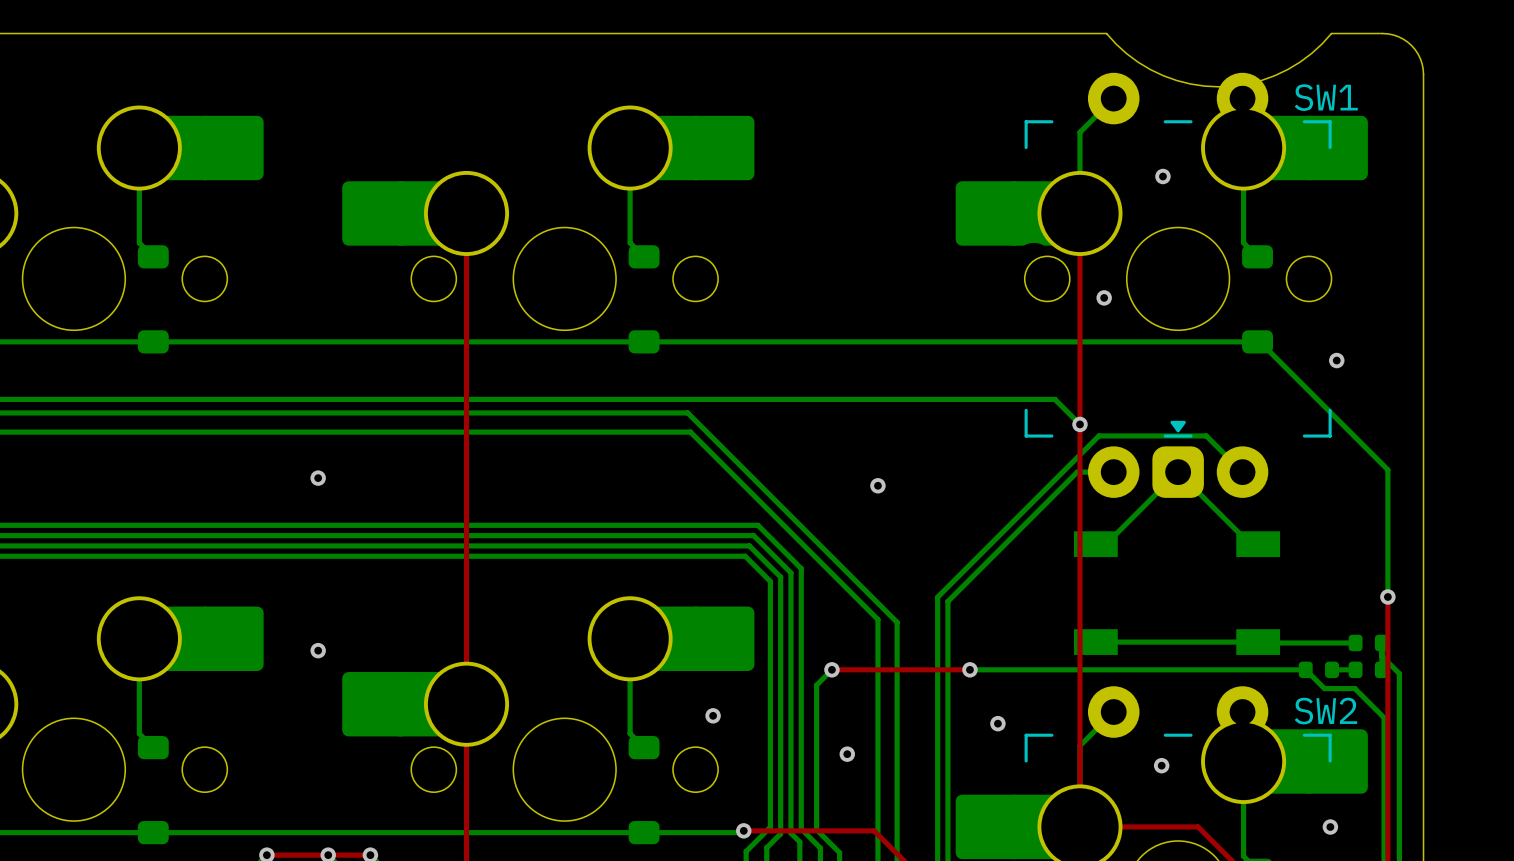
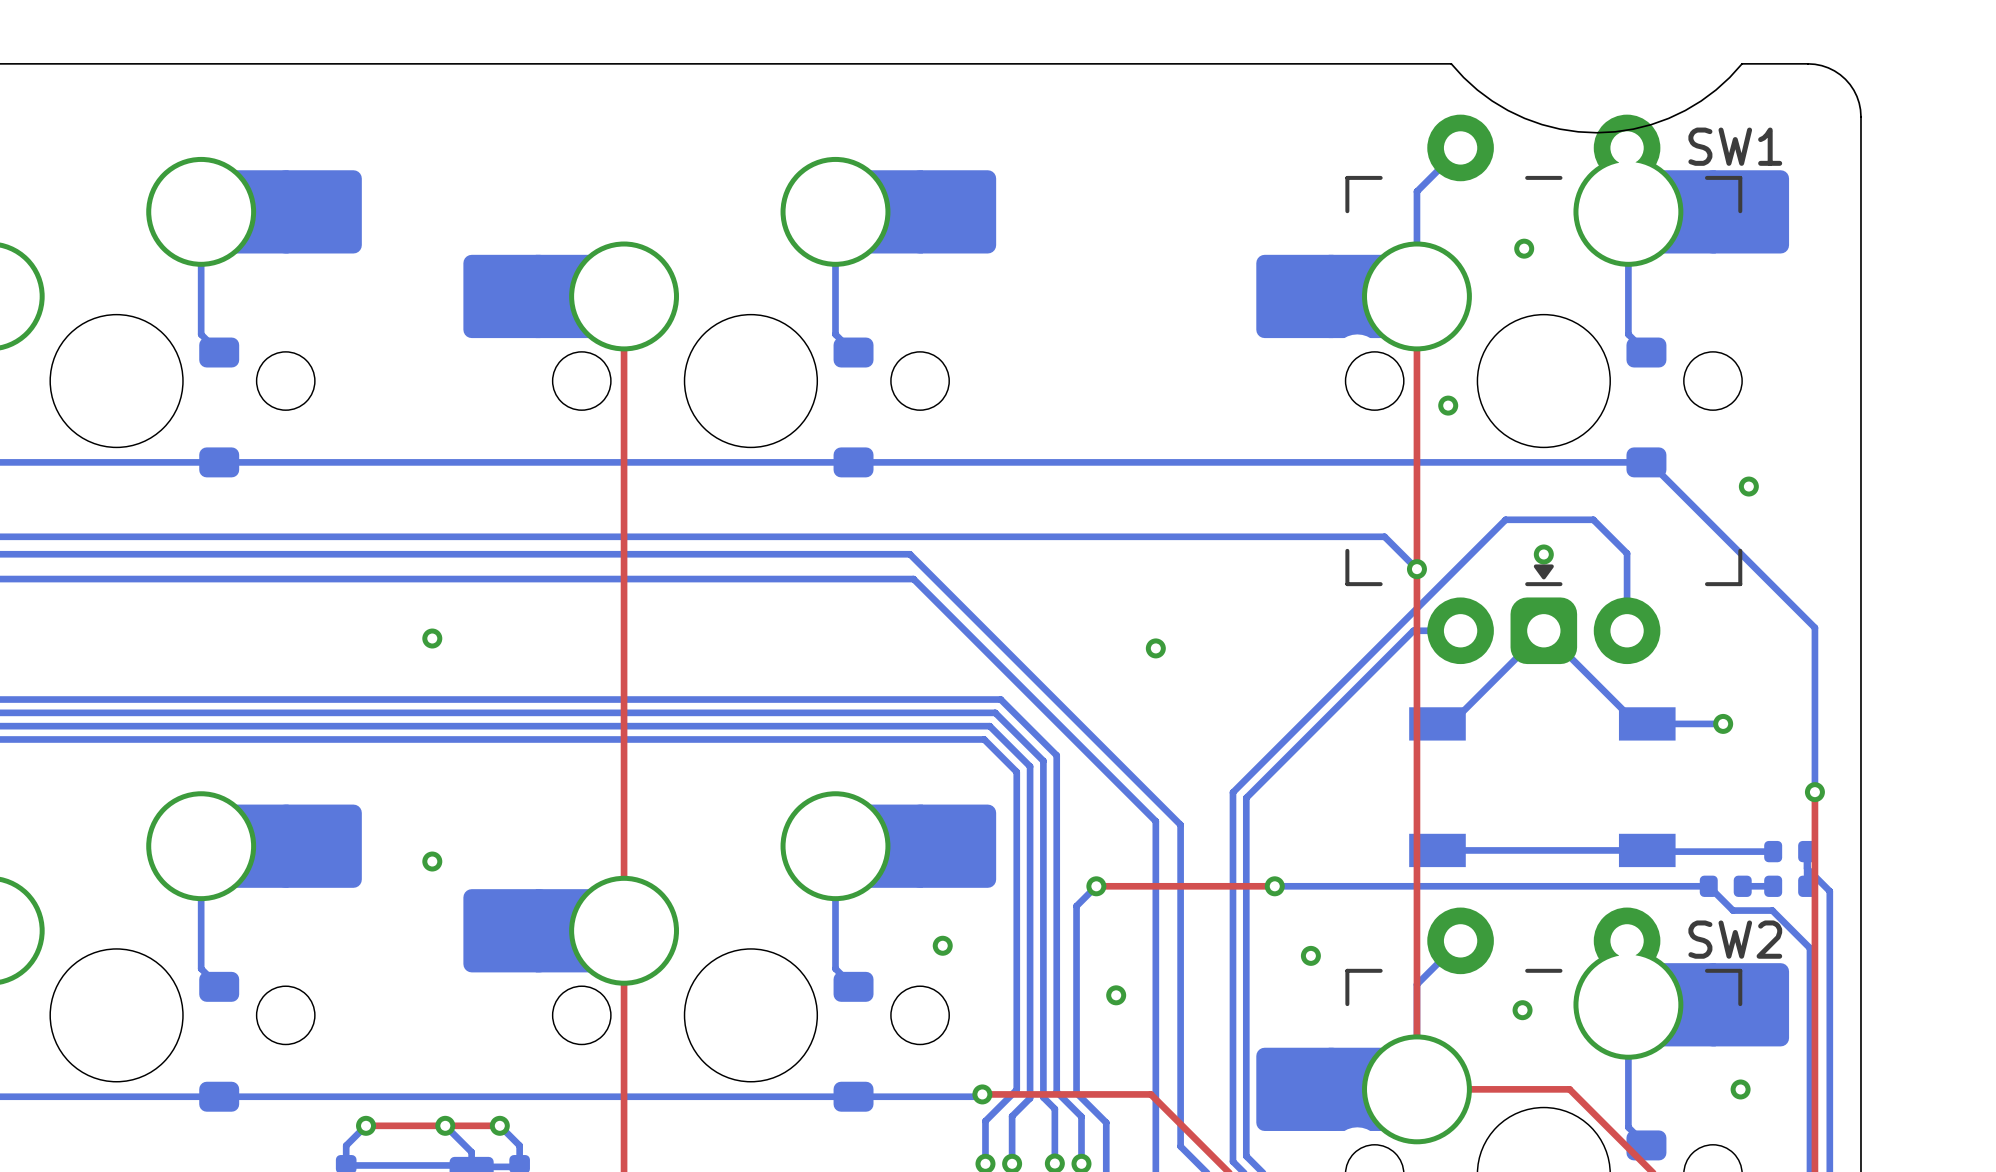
via: none -> (1543, 554)
bottom track: (1098, 435) (1206, 435) (1242, 472) -> (1441, 584) (1505, 519) (1593, 519) (1627, 553) (1627, 630)
bottom track: none -> (1647, 723) (1723, 723)
via: none -> (1723, 723)

